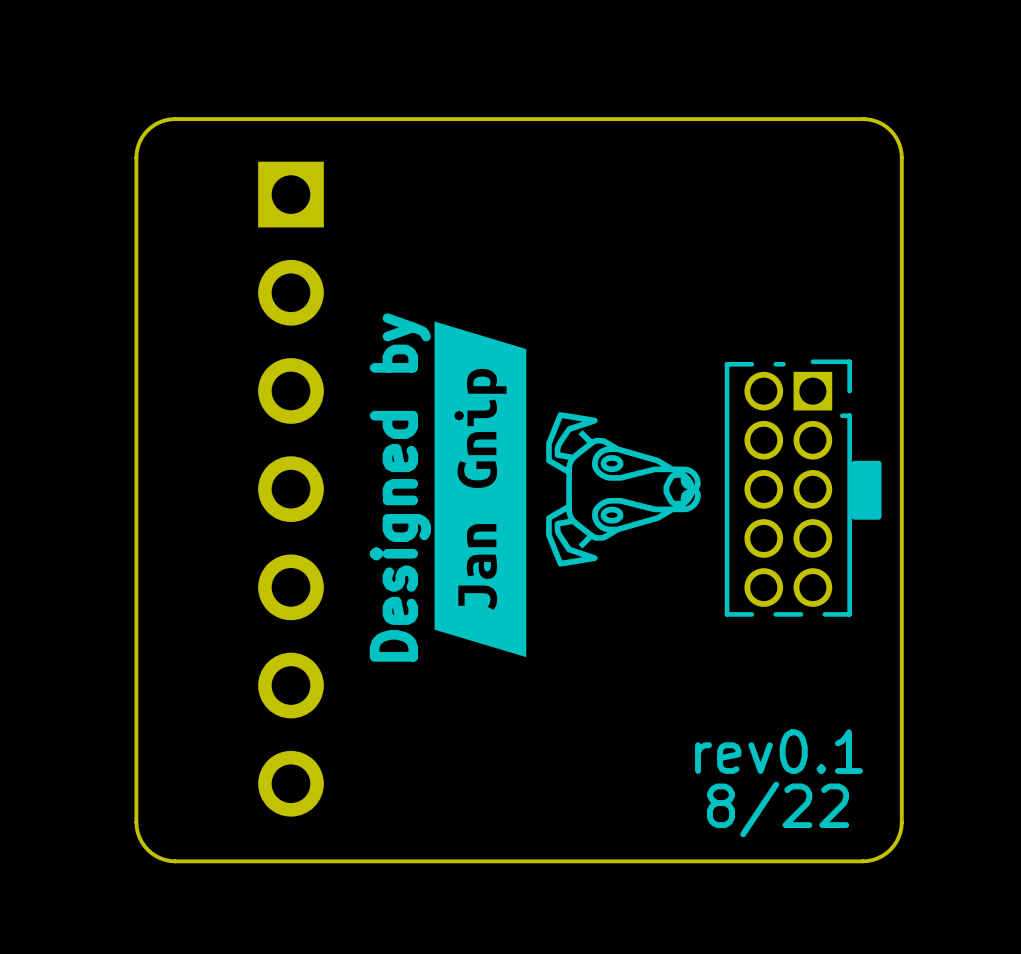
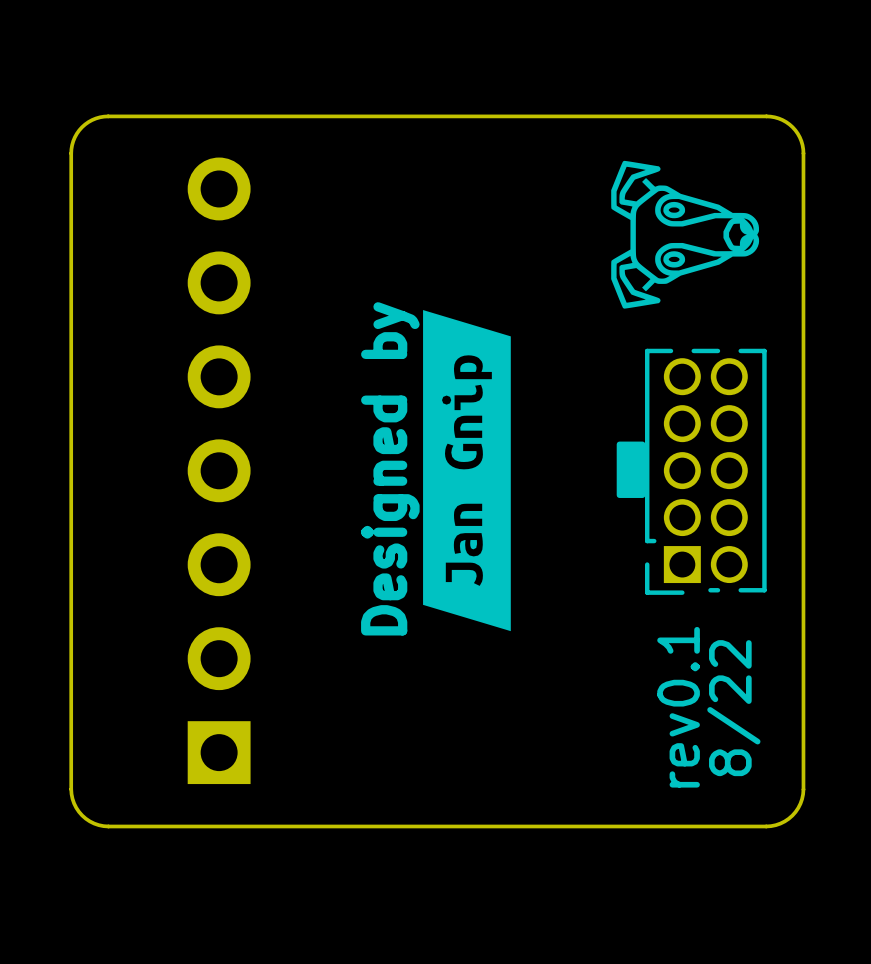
text position: Designed by (400, 487) -> Designed by (390, 468)
part rotation: 0° (788, 488) -> 180° (705, 471)
part rotation: 0° (291, 489) -> 180° (219, 470)
drawing position: (480, 489) -> (466, 470)
drawing position: (623, 489) -> (685, 234)
drawing position: (866, 490) -> (631, 469)
text rotation: 0° (779, 751) -> 90° counterclockwise (678, 707)
text rotation: 0° (778, 809) -> 90° counterclockwise (733, 708)

